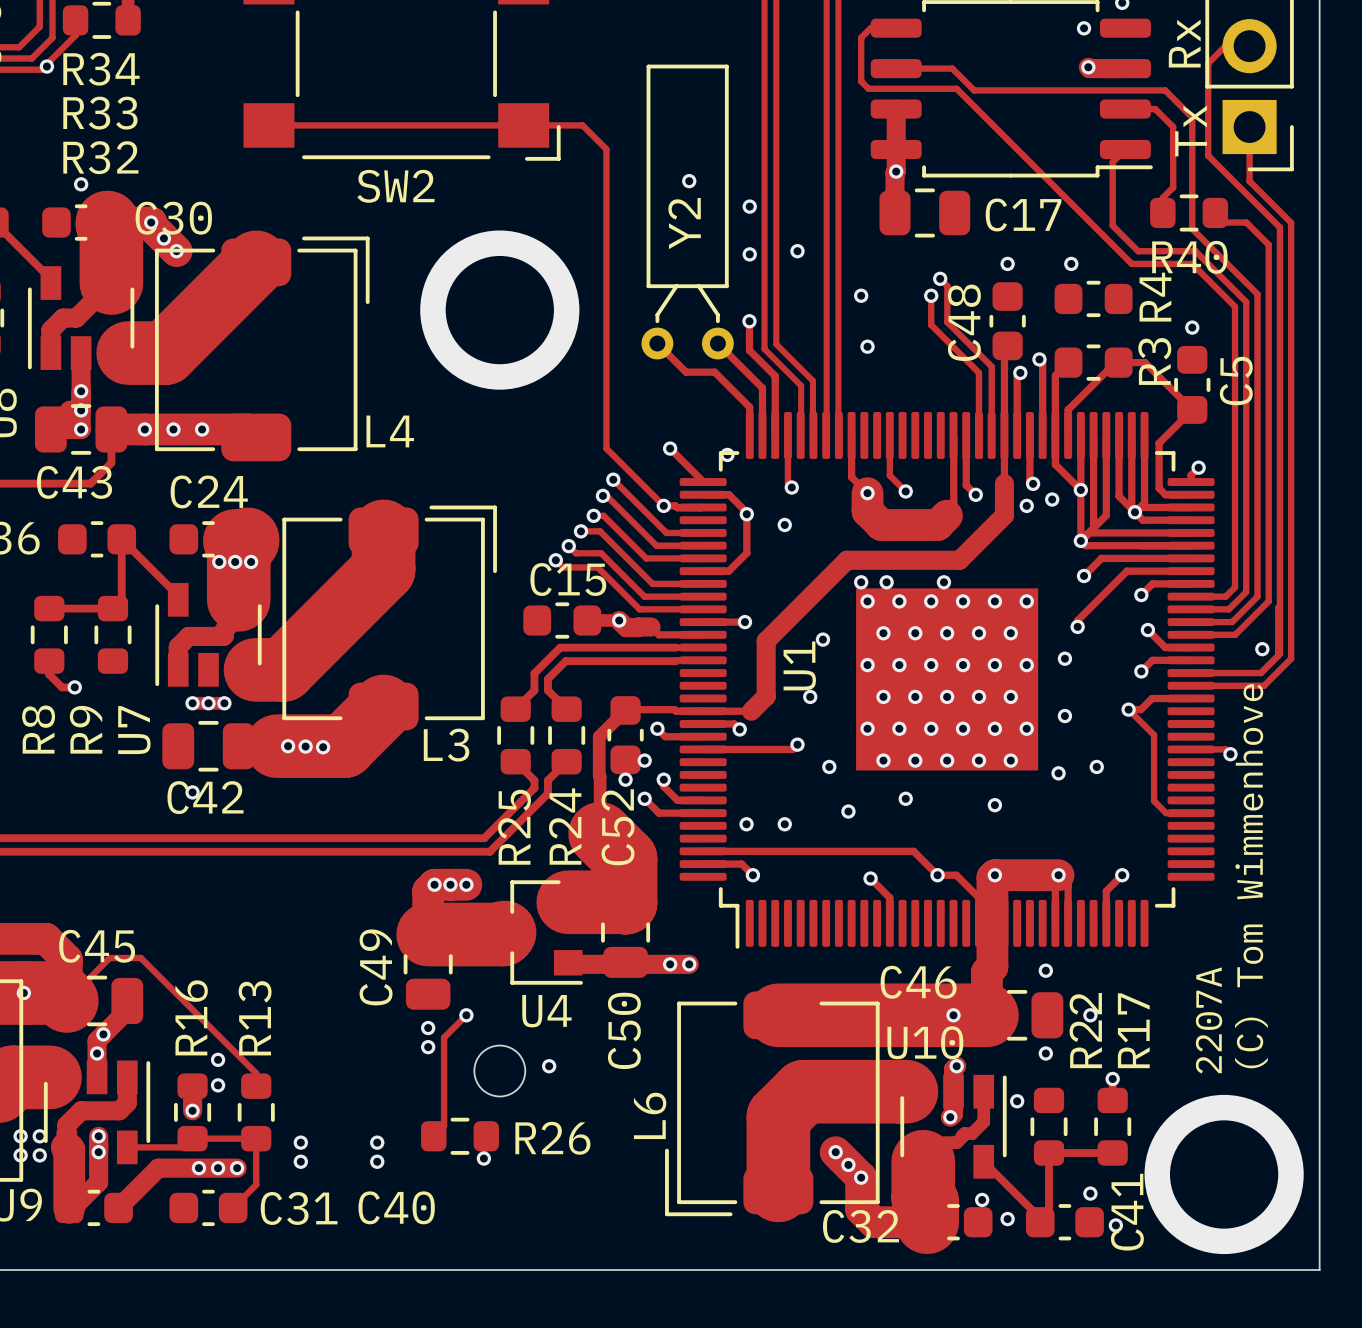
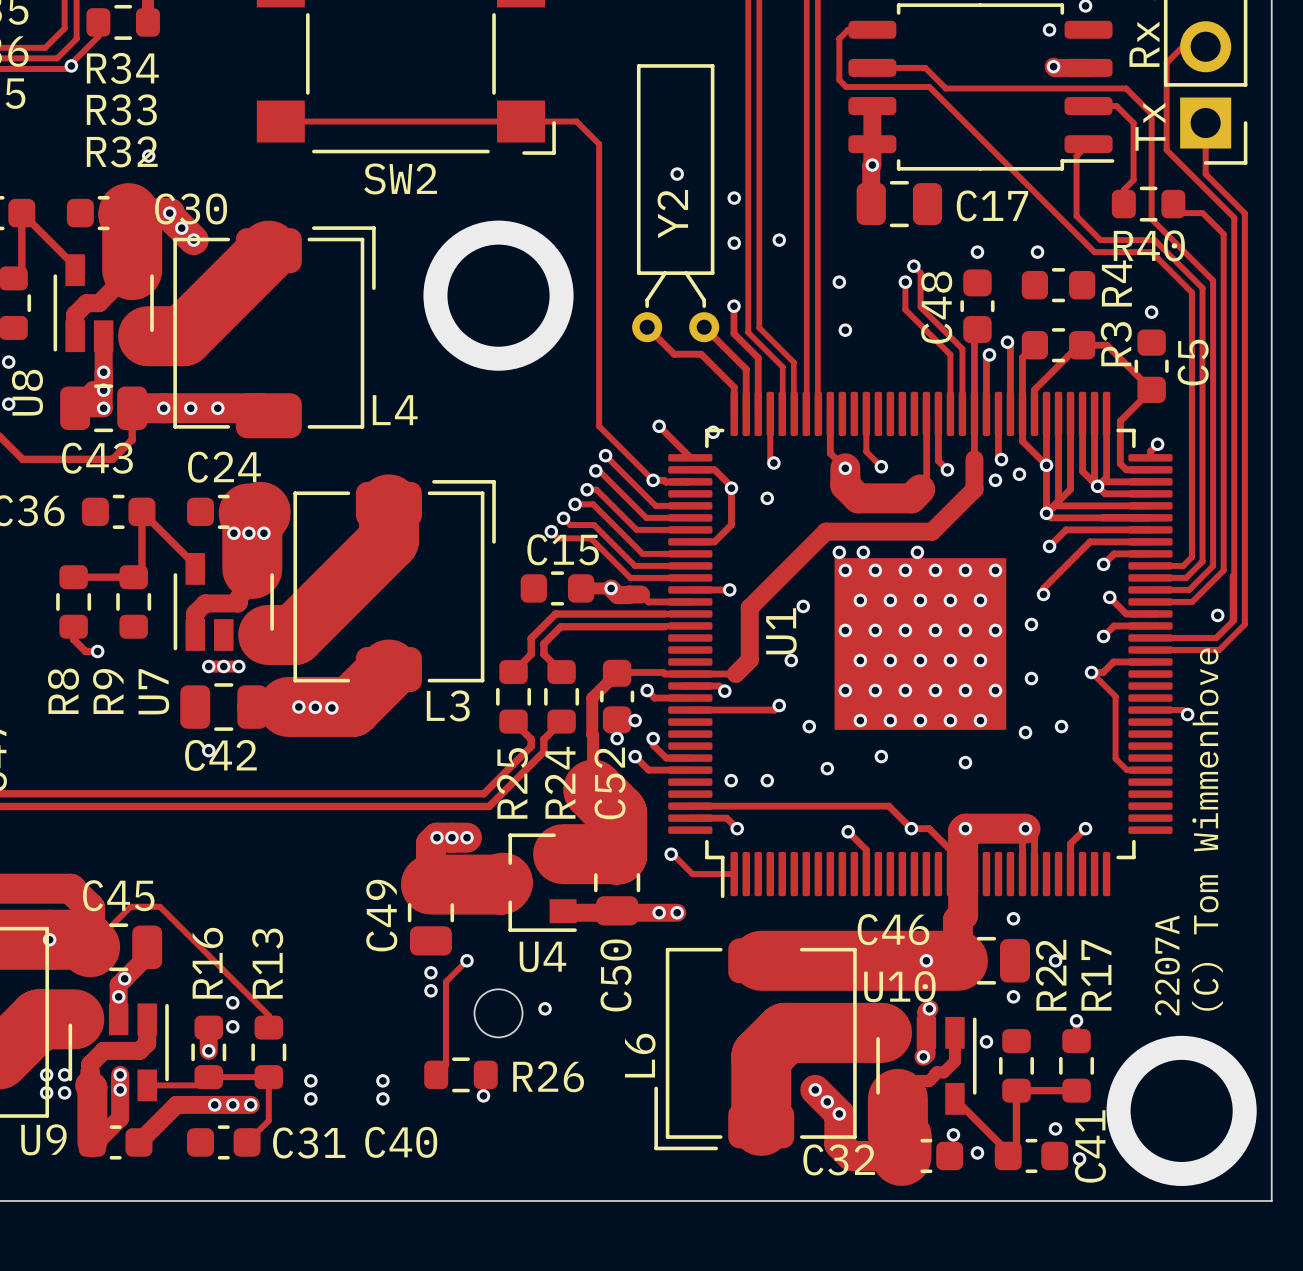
via position: (81, 184) -> (148, 156)
track: none -> (671, 854) (692, 874) (734, 874)
via: none -> (671, 854)

